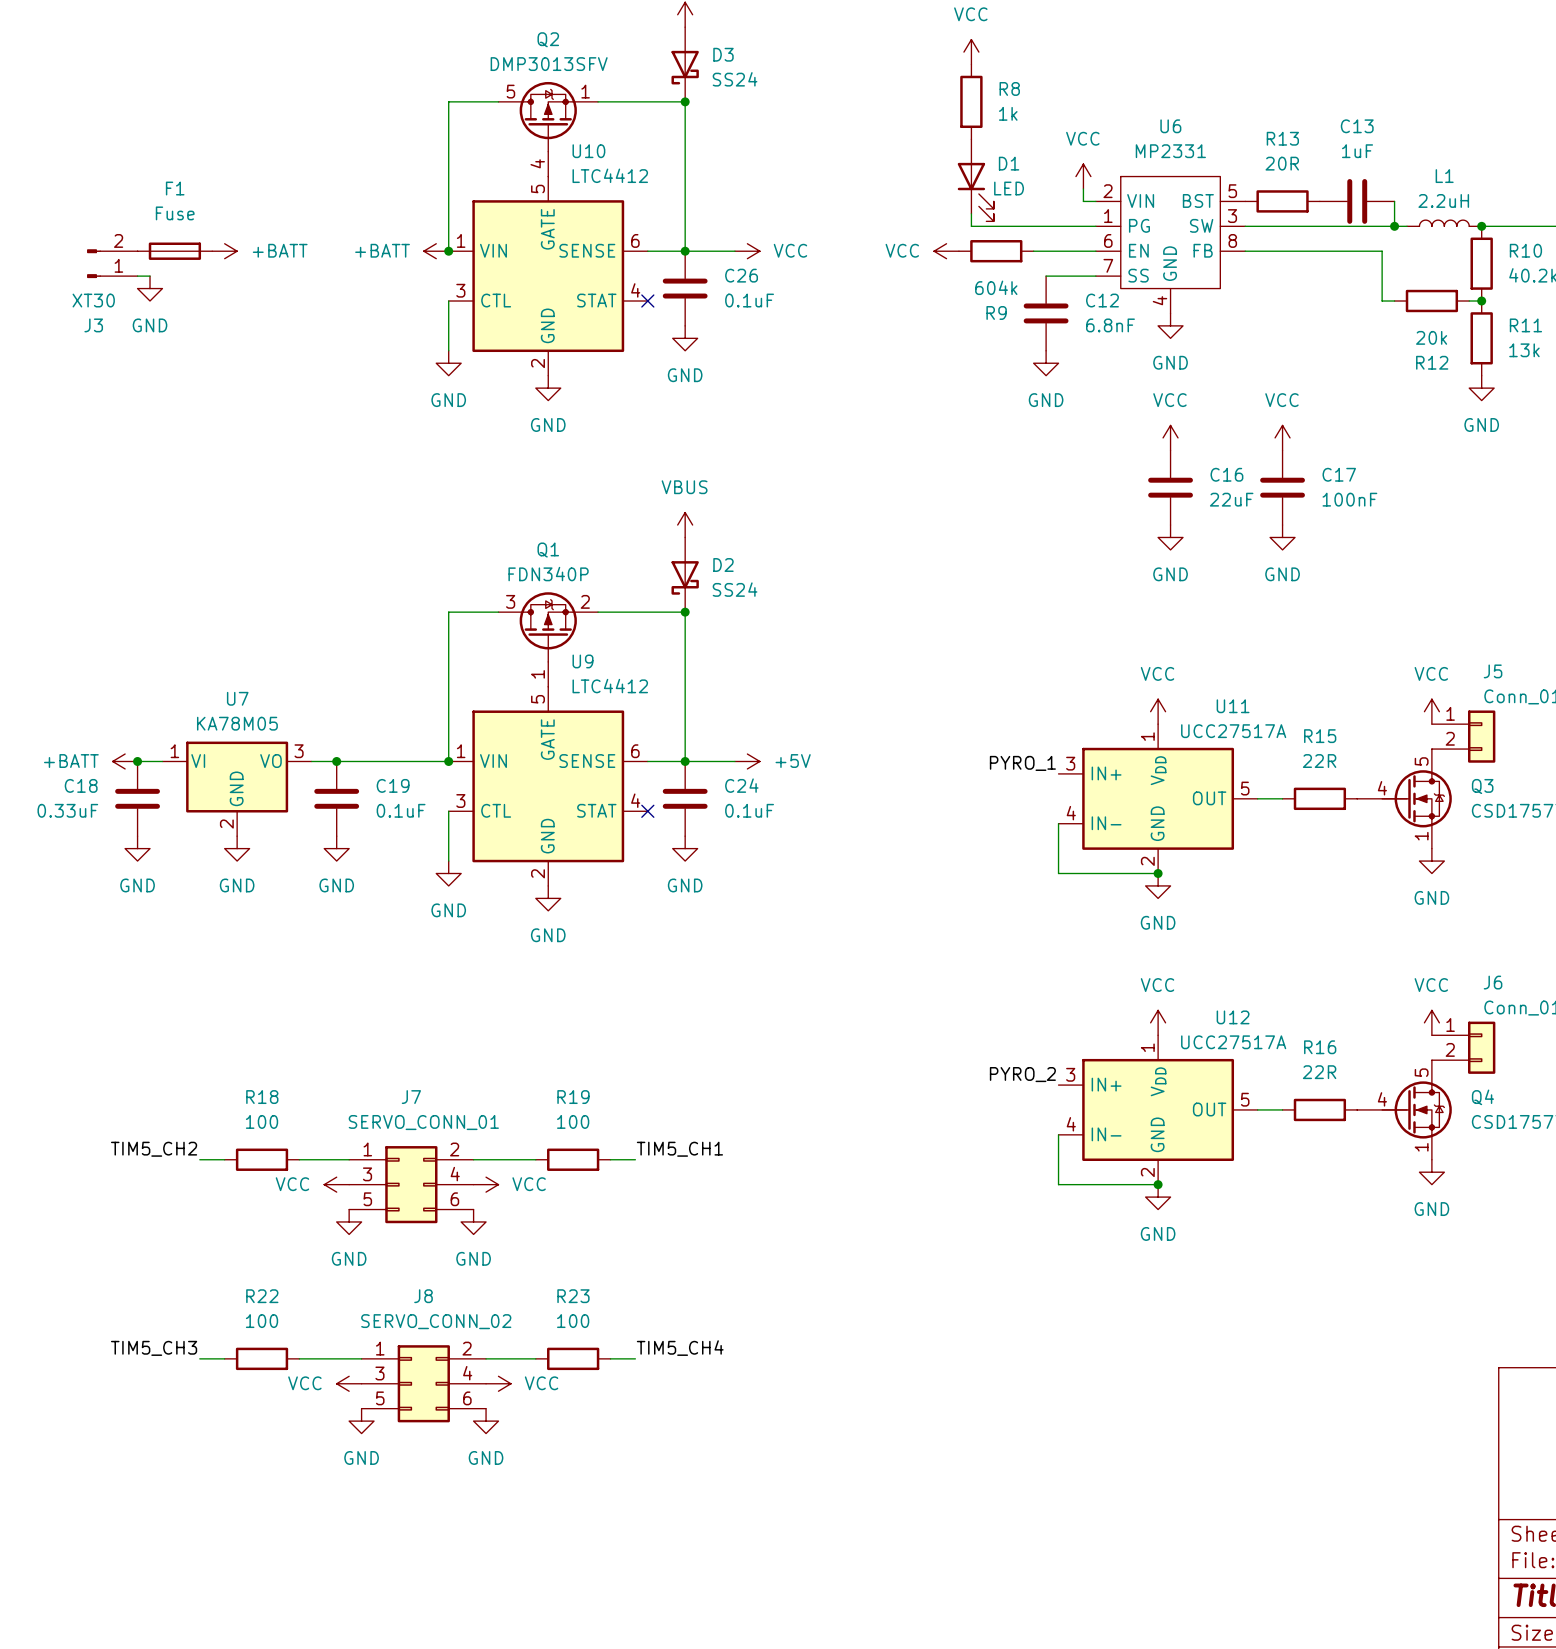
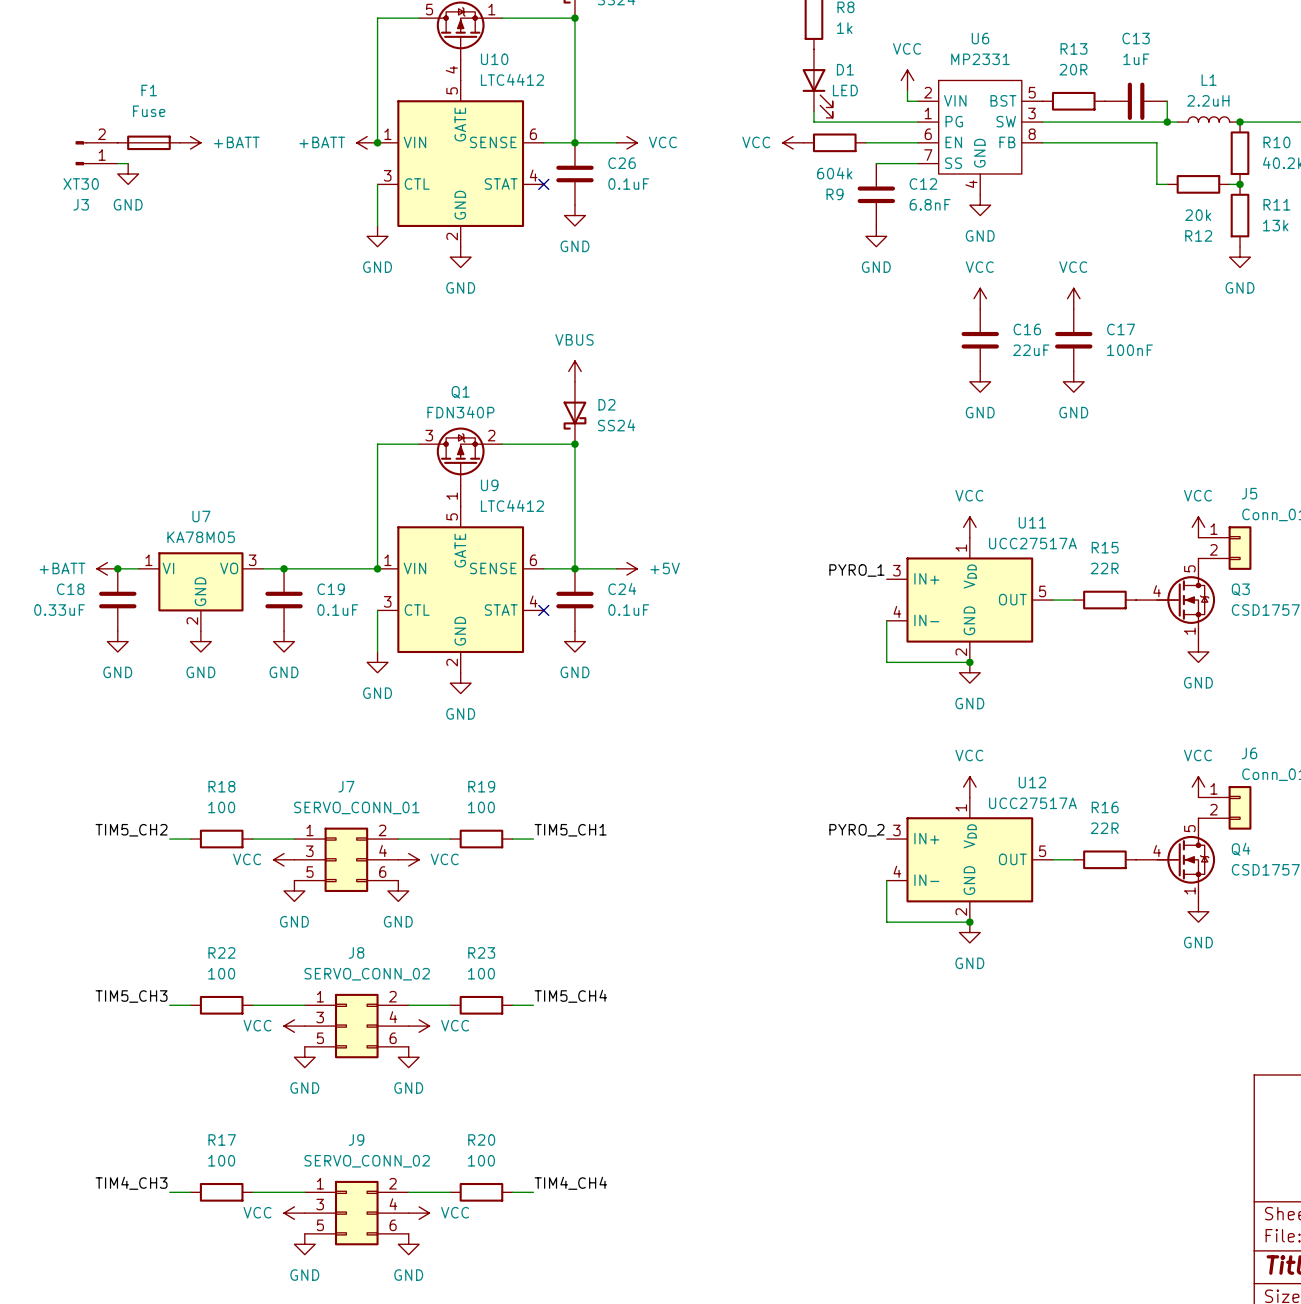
power symbol: none -> VCC (284, 859)
power symbol: none -> VCC (408, 859)
power symbol: none -> GND (294, 890)
power symbol: none -> GND (398, 890)
label position: TIM5_CH2 (154, 1149) -> TIM5_CH2 (131, 830)
label position: TIM5_CH1 (679, 1149) -> TIM5_CH1 (570, 830)
wire: (199, 1159) (224, 1159) -> (169, 839) (190, 839)
R18 position: (262, 1159) -> (221, 839)
wire: (299, 1159) (349, 1159) -> (252, 839) (294, 839)
wire: (473, 1159) (535, 1159) -> (398, 839) (450, 839)
R19 position: (573, 1159) -> (481, 839)
wire: (610, 1159) (635, 1159) -> (512, 839) (533, 839)
power symbol: VCC (336, 1184) -> none
J7 position: (411, 1184) -> (346, 859)
power symbol: VCC (486, 1184) -> none
power symbol: GND (349, 1221) -> none
power symbol: GND (473, 1221) -> none
power symbol: none -> VCC (294, 1026)
power symbol: none -> VCC (419, 1026)
power symbol: none -> GND (304, 1057)
power symbol: none -> GND (408, 1057)
label position: TIM5_CH3 (154, 1348) -> TIM5_CH3 (131, 996)
label position: TIM5_CH4 (680, 1348) -> TIM5_CH4 (570, 996)
wire: (199, 1358) (224, 1358) -> (169, 1005) (190, 1005)
R22 position: (262, 1358) -> (221, 1005)
wire: (299, 1358) (361, 1358) -> (252, 1005) (304, 1005)
wire: (486, 1358) (535, 1358) -> (408, 1005) (450, 1005)
R23 position: (573, 1358) -> (481, 1005)
wire: (610, 1358) (635, 1358) -> (512, 1005) (533, 1005)
power symbol: VCC (349, 1383) -> none
J8 position: (423, 1383) -> (356, 1026)
power symbol: VCC (498, 1383) -> none
power symbol: GND (361, 1421) -> none
power symbol: GND (486, 1421) -> none
label: none -> TIM4_CH3 (131, 1183)
label: none -> TIM4_CH4 (570, 1183)
wire: none -> (169, 1192) (190, 1192)
R17: none -> 100 (221, 1192)
wire: none -> (252, 1192) (304, 1192)
wire: none -> (408, 1192) (450, 1192)
R20: none -> 100 (481, 1192)
wire: none -> (512, 1192) (533, 1192)
power symbol: none -> VCC (294, 1213)
J9: none -> SERVO_CONN_02 (356, 1213)
power symbol: none -> VCC (419, 1213)
power symbol: none -> GND (304, 1244)
power symbol: none -> GND (408, 1244)

